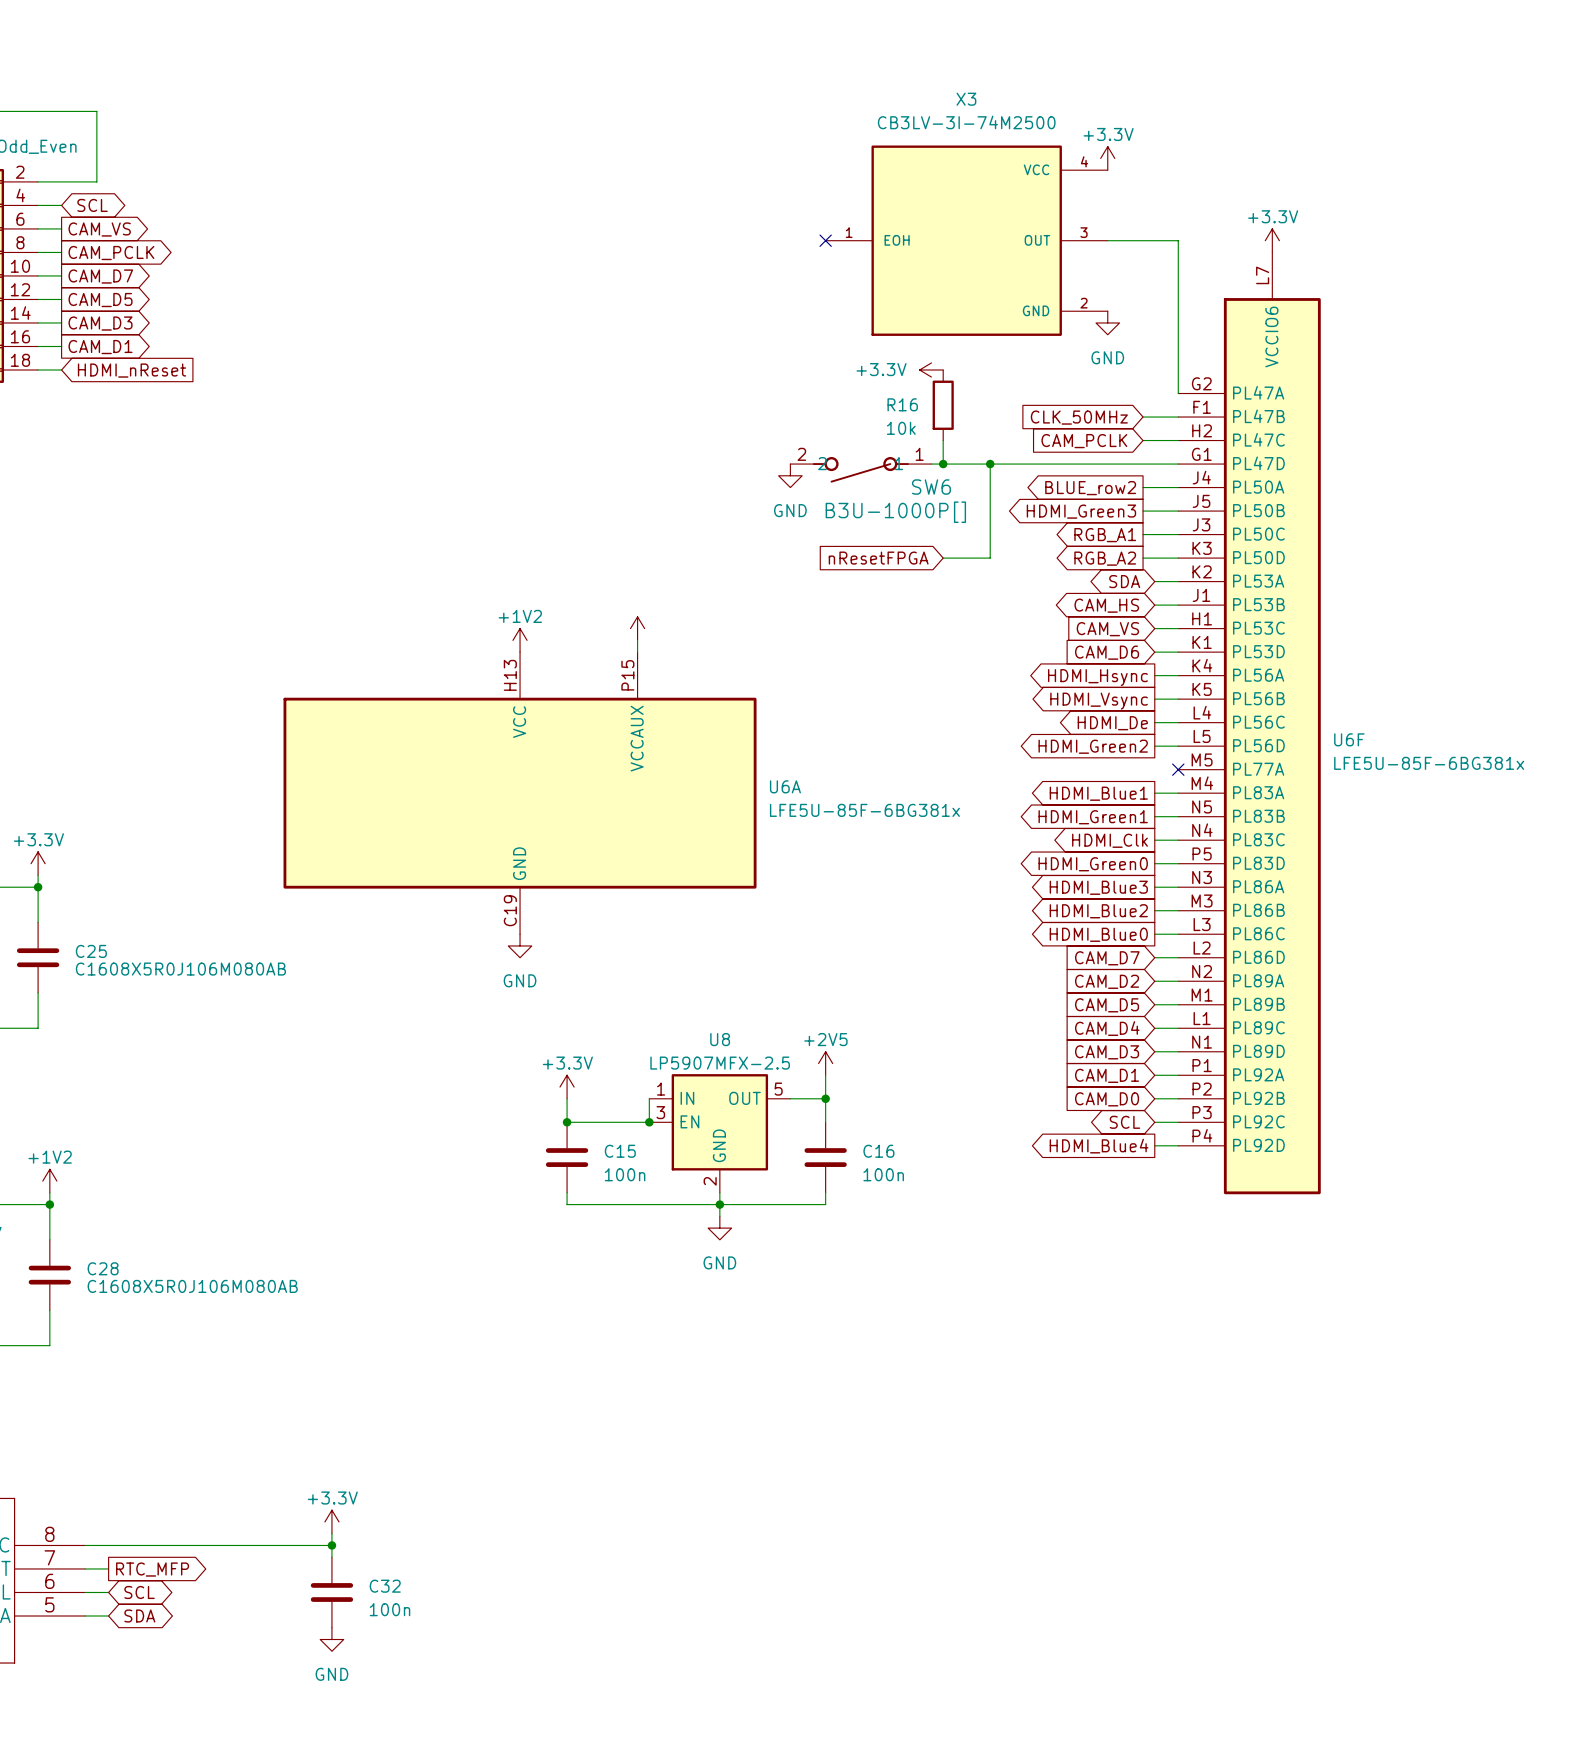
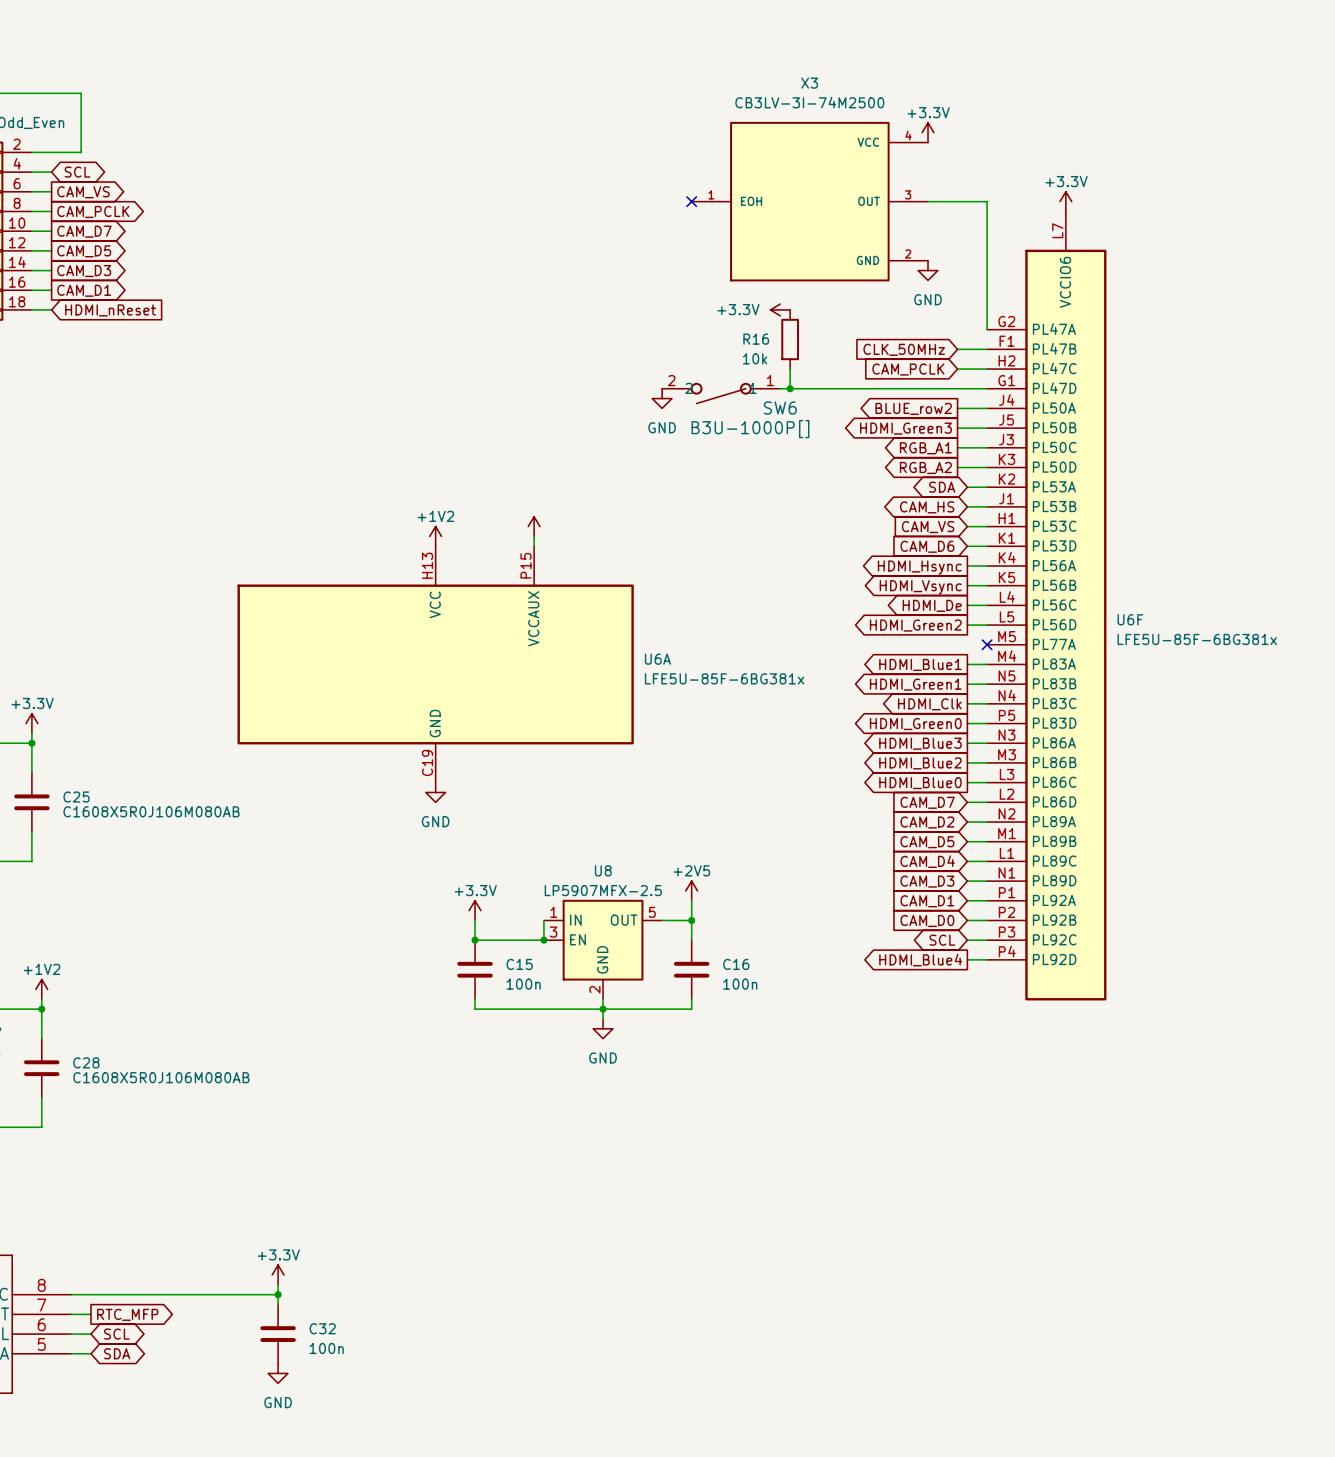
wire: (990, 464) (990, 558) (943, 558) -> none
junction: (990, 464) -> none
global label: nResetFPGA (878, 558) -> none

